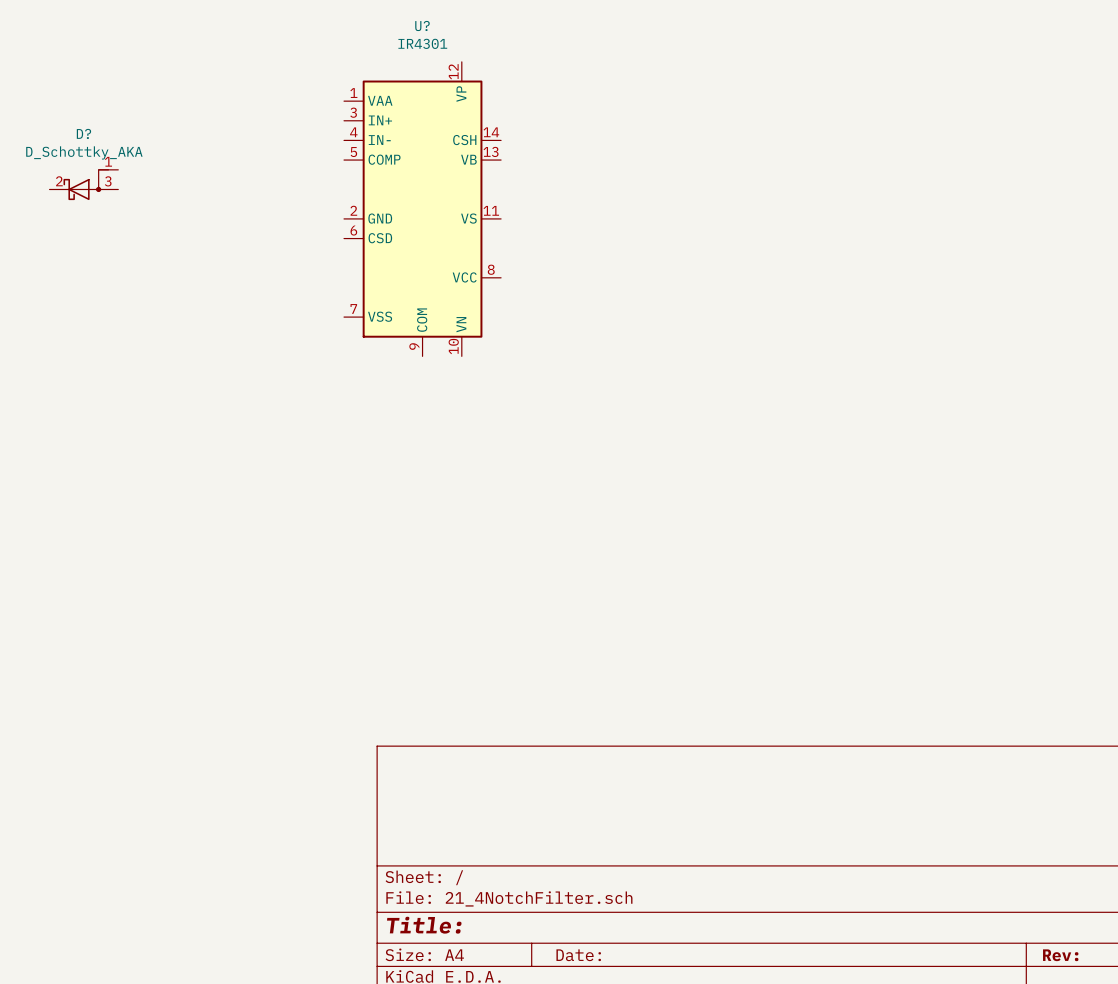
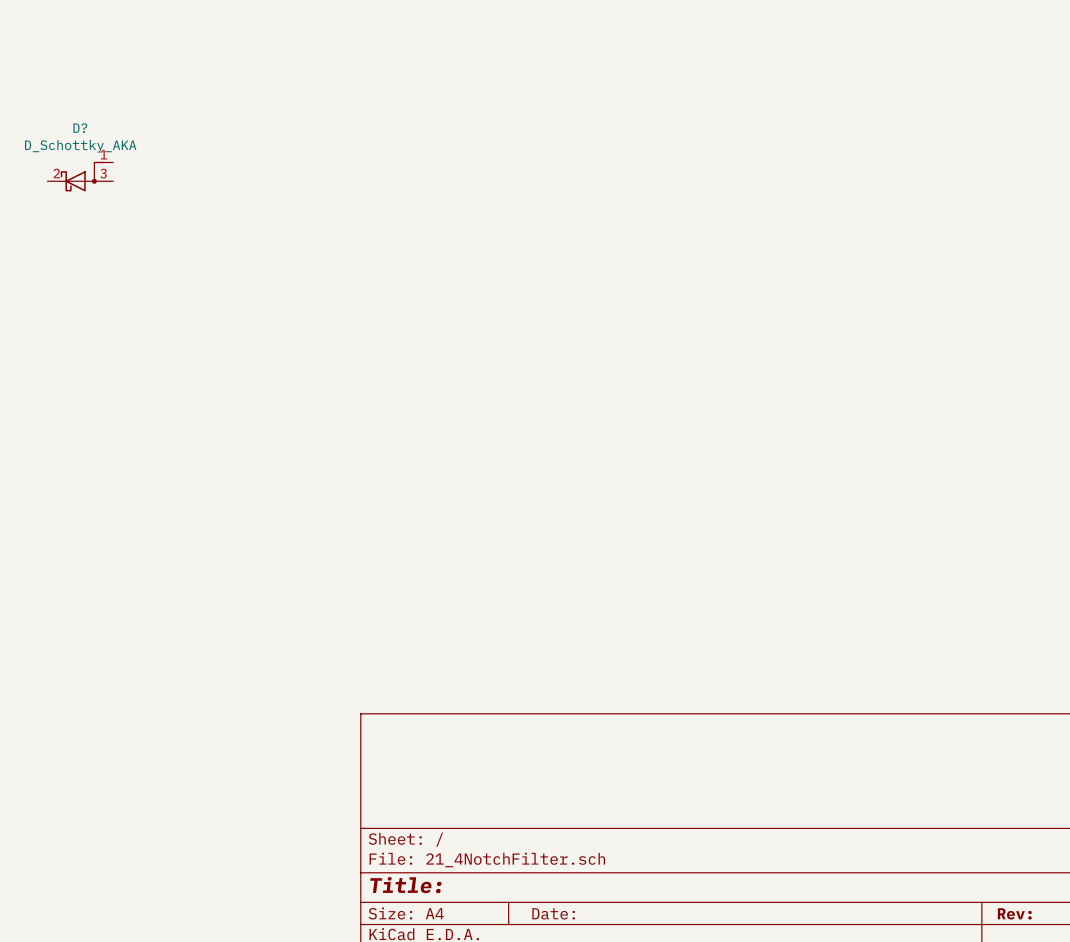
U?: IR4301 (422, 209) -> none

